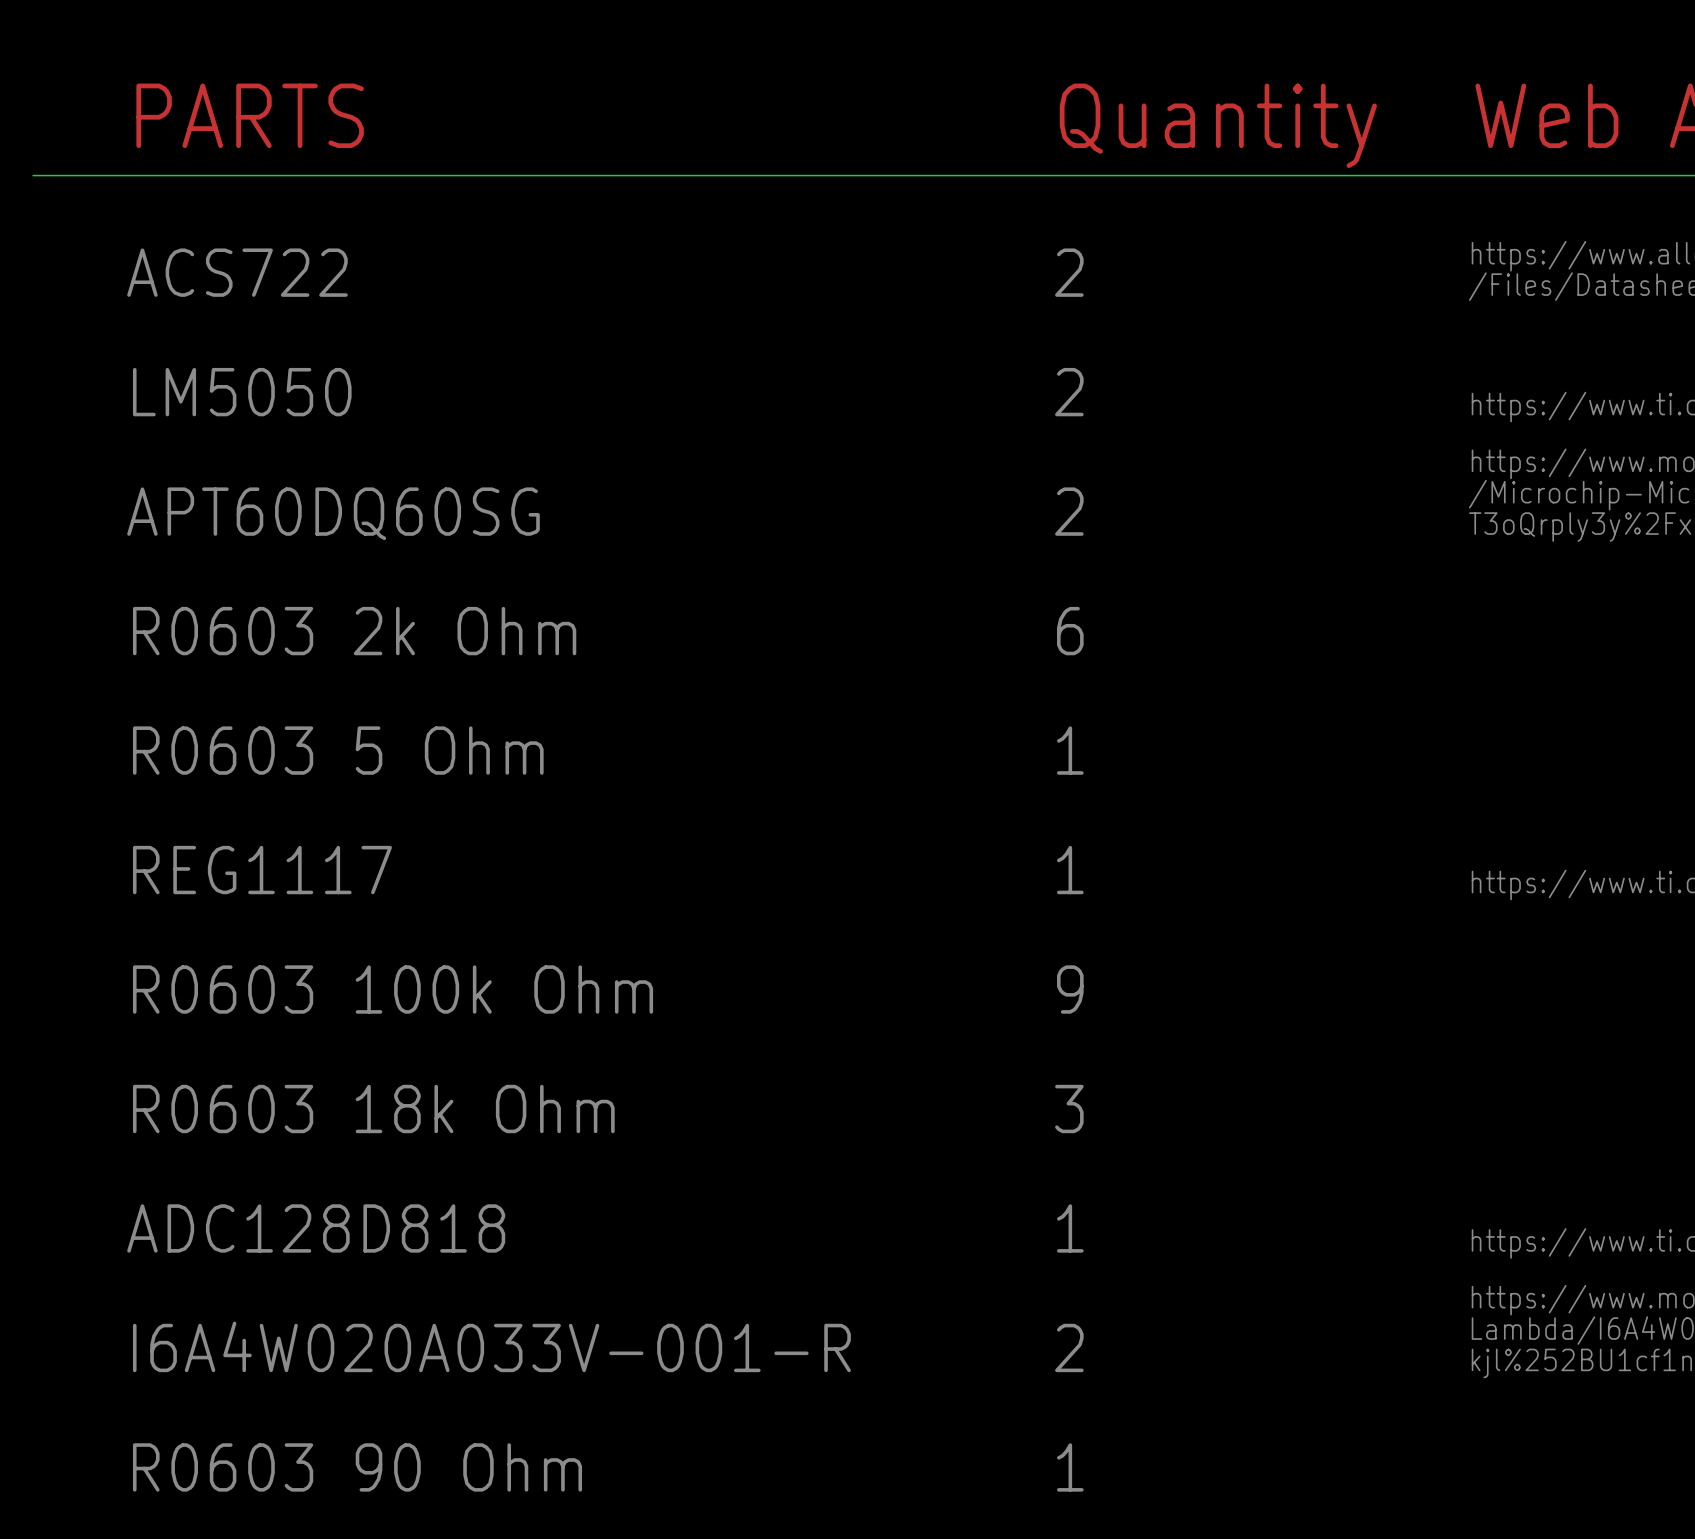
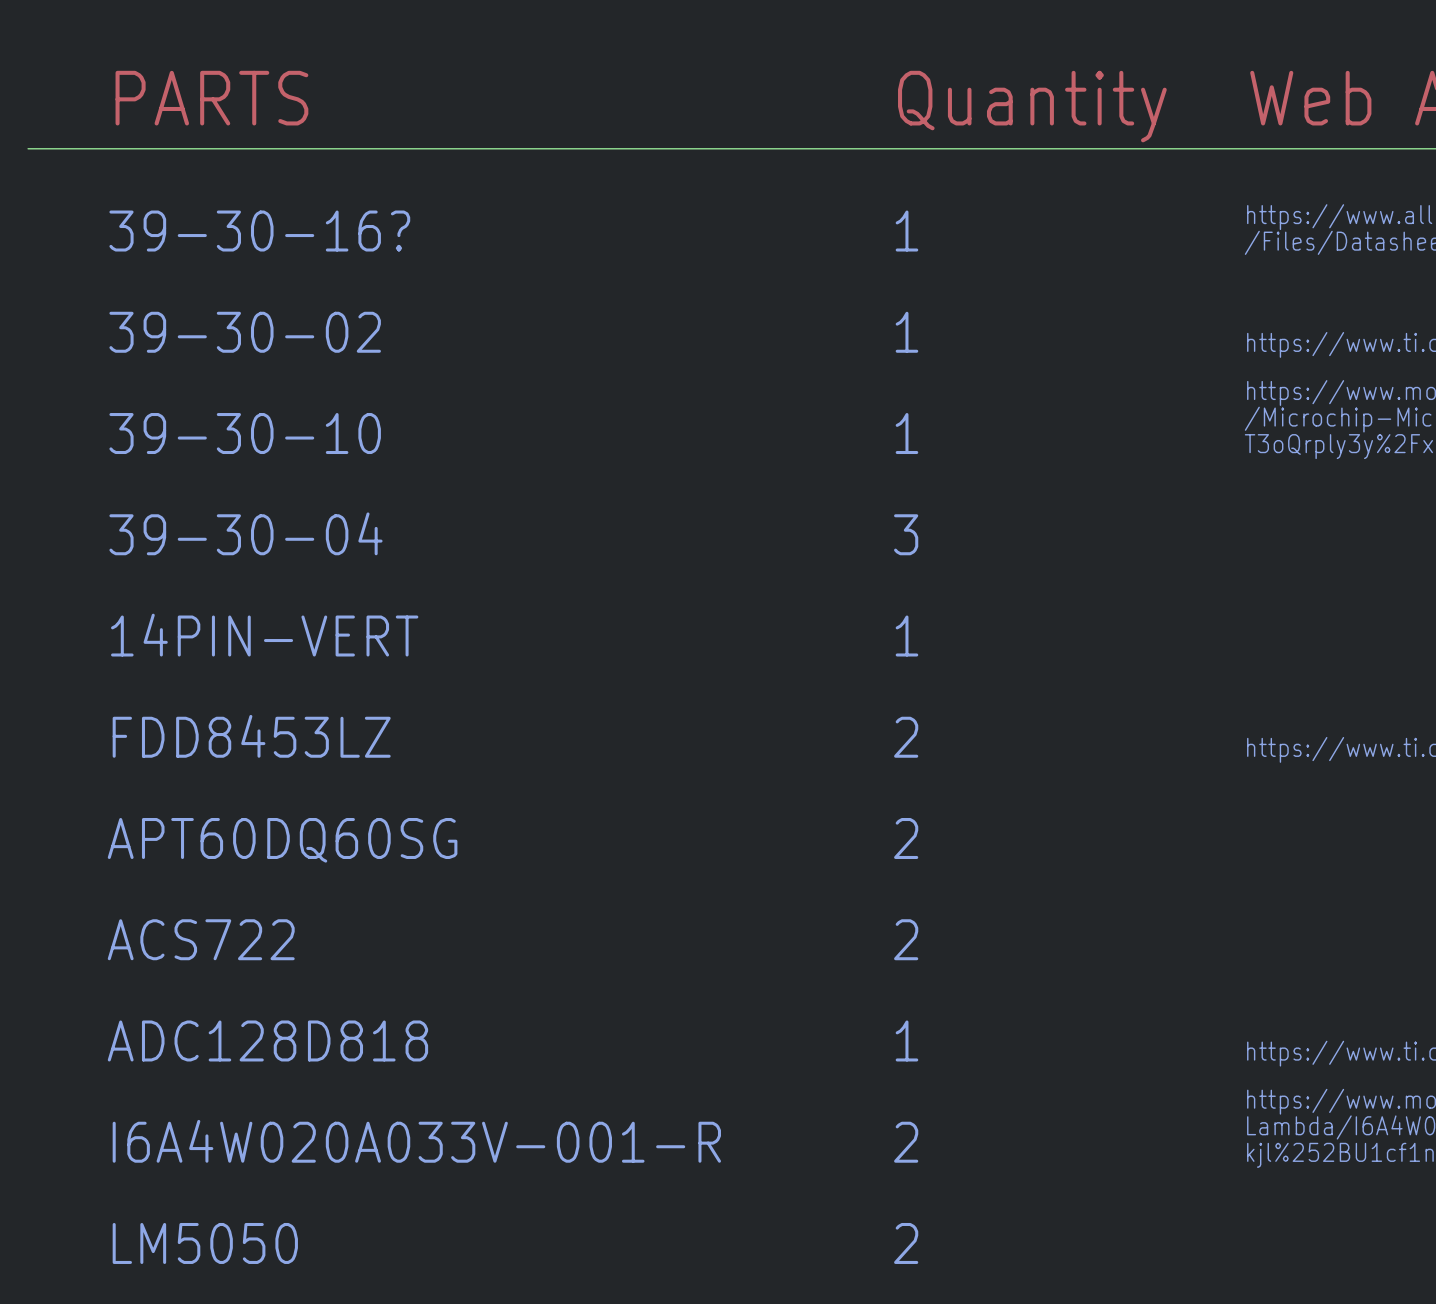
text: ACS722 (237, 272) -> 39-30-16? (259, 231)
text: 2 (1069, 272) -> 1 (906, 231)
text: LM5050 (242, 392) -> 39-30-02 (245, 332)
text: 2 (1069, 392) -> 1 (906, 332)
text: 2 (1069, 511) -> 1 (906, 433)
text: APT60DQ60SG (333, 513) -> 39-30-10 (245, 433)
text: R0603 2k Ohm (354, 631) -> 39-30-04 (245, 533)
text: 6 (1070, 631) -> 3 (906, 534)
text: R0603 5 Ohm (338, 750) -> 14PIN-VERT (264, 635)
text: REG1117 (262, 870) -> FDD8453LZ (251, 736)
text: 1 (1070, 870) -> 2 (906, 737)
text: R0603 100k Ohm (393, 989) -> APT60DQ60SG (282, 840)
text: 9 (1070, 989) -> 2 (906, 838)
text: R0603 18k Ohm (373, 1109) -> ACS722 (201, 939)
text: 3 (1069, 1109) -> 2 (906, 939)
text: R0603 90 Ohm (357, 1467) -> LM5050 (205, 1243)
text: 1 (1070, 1467) -> 2 (906, 1243)

